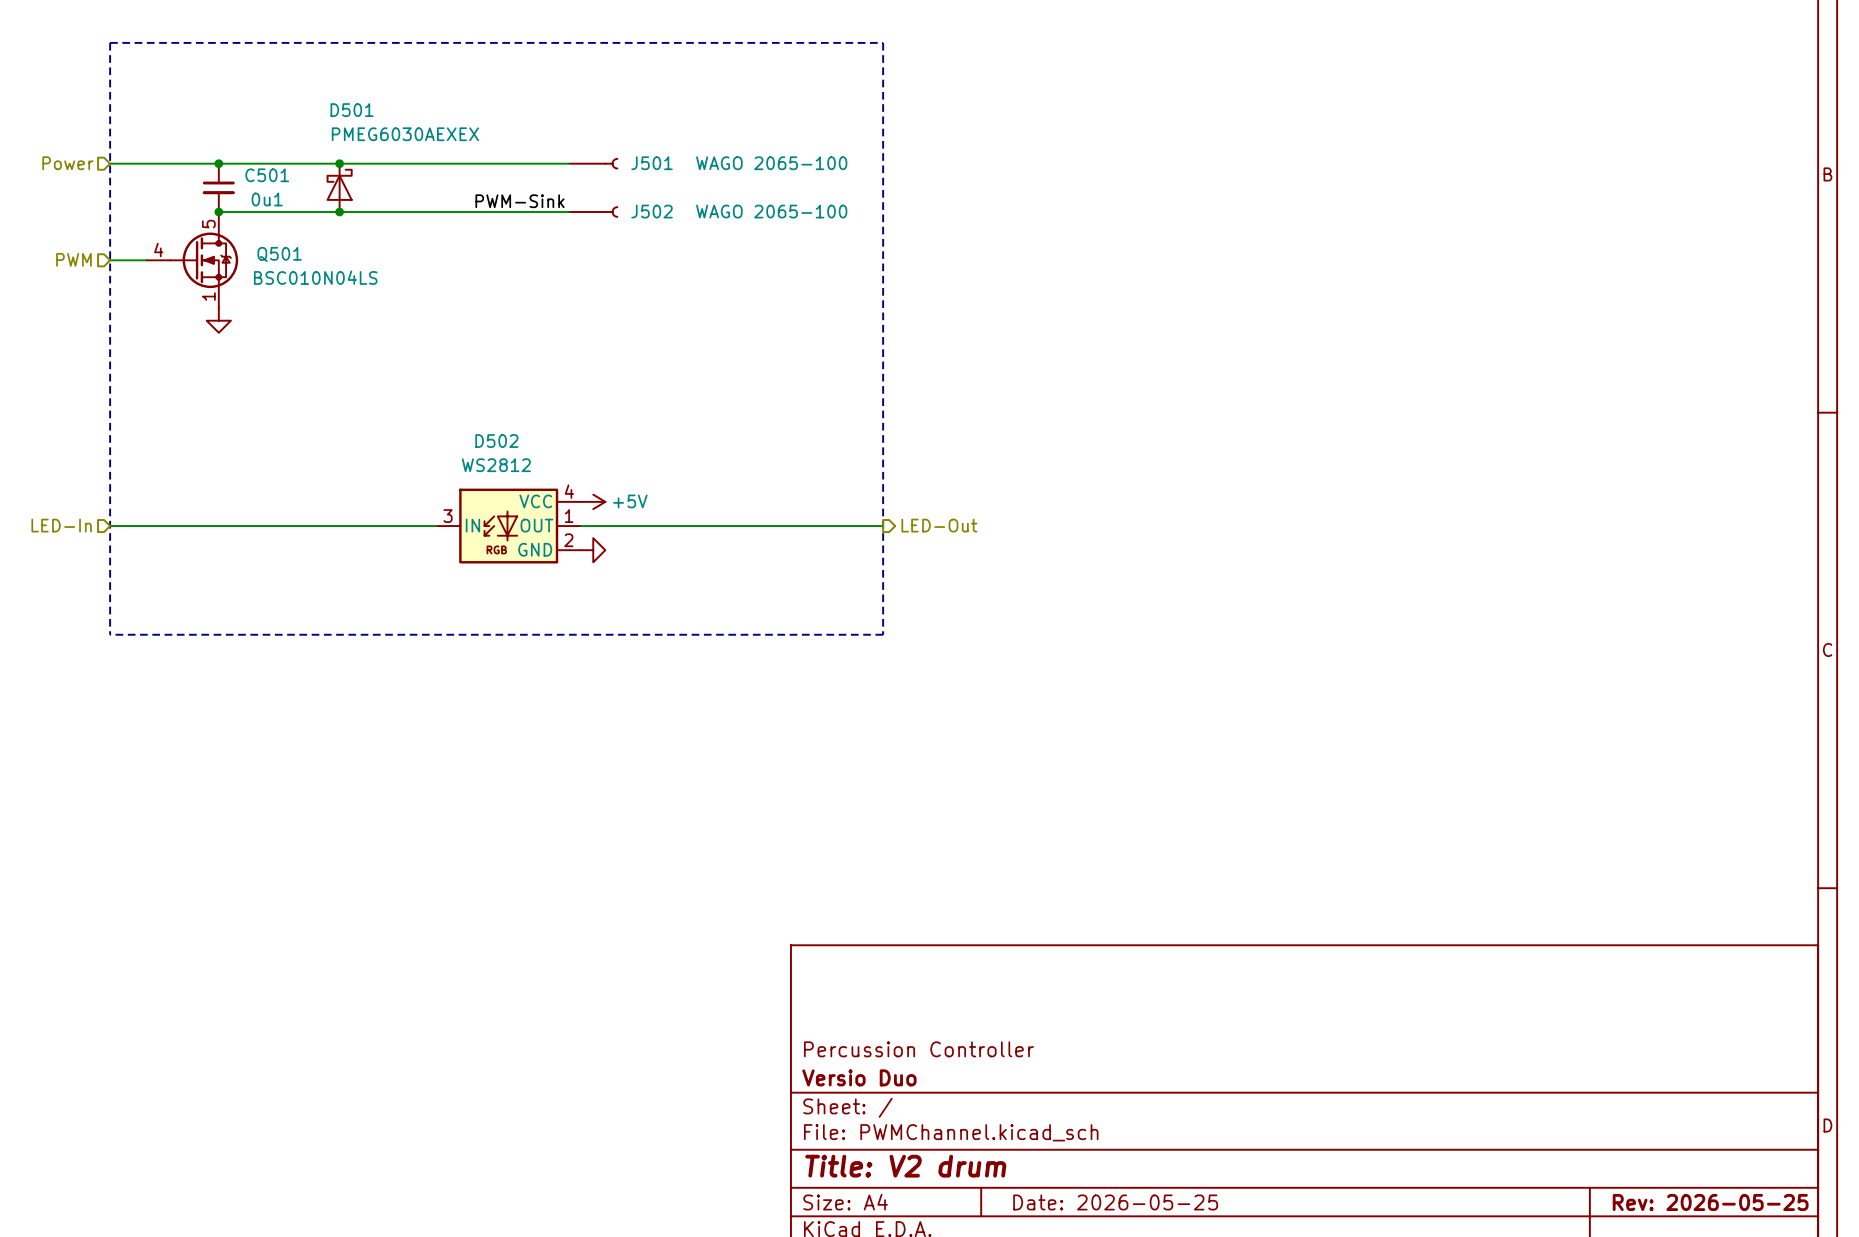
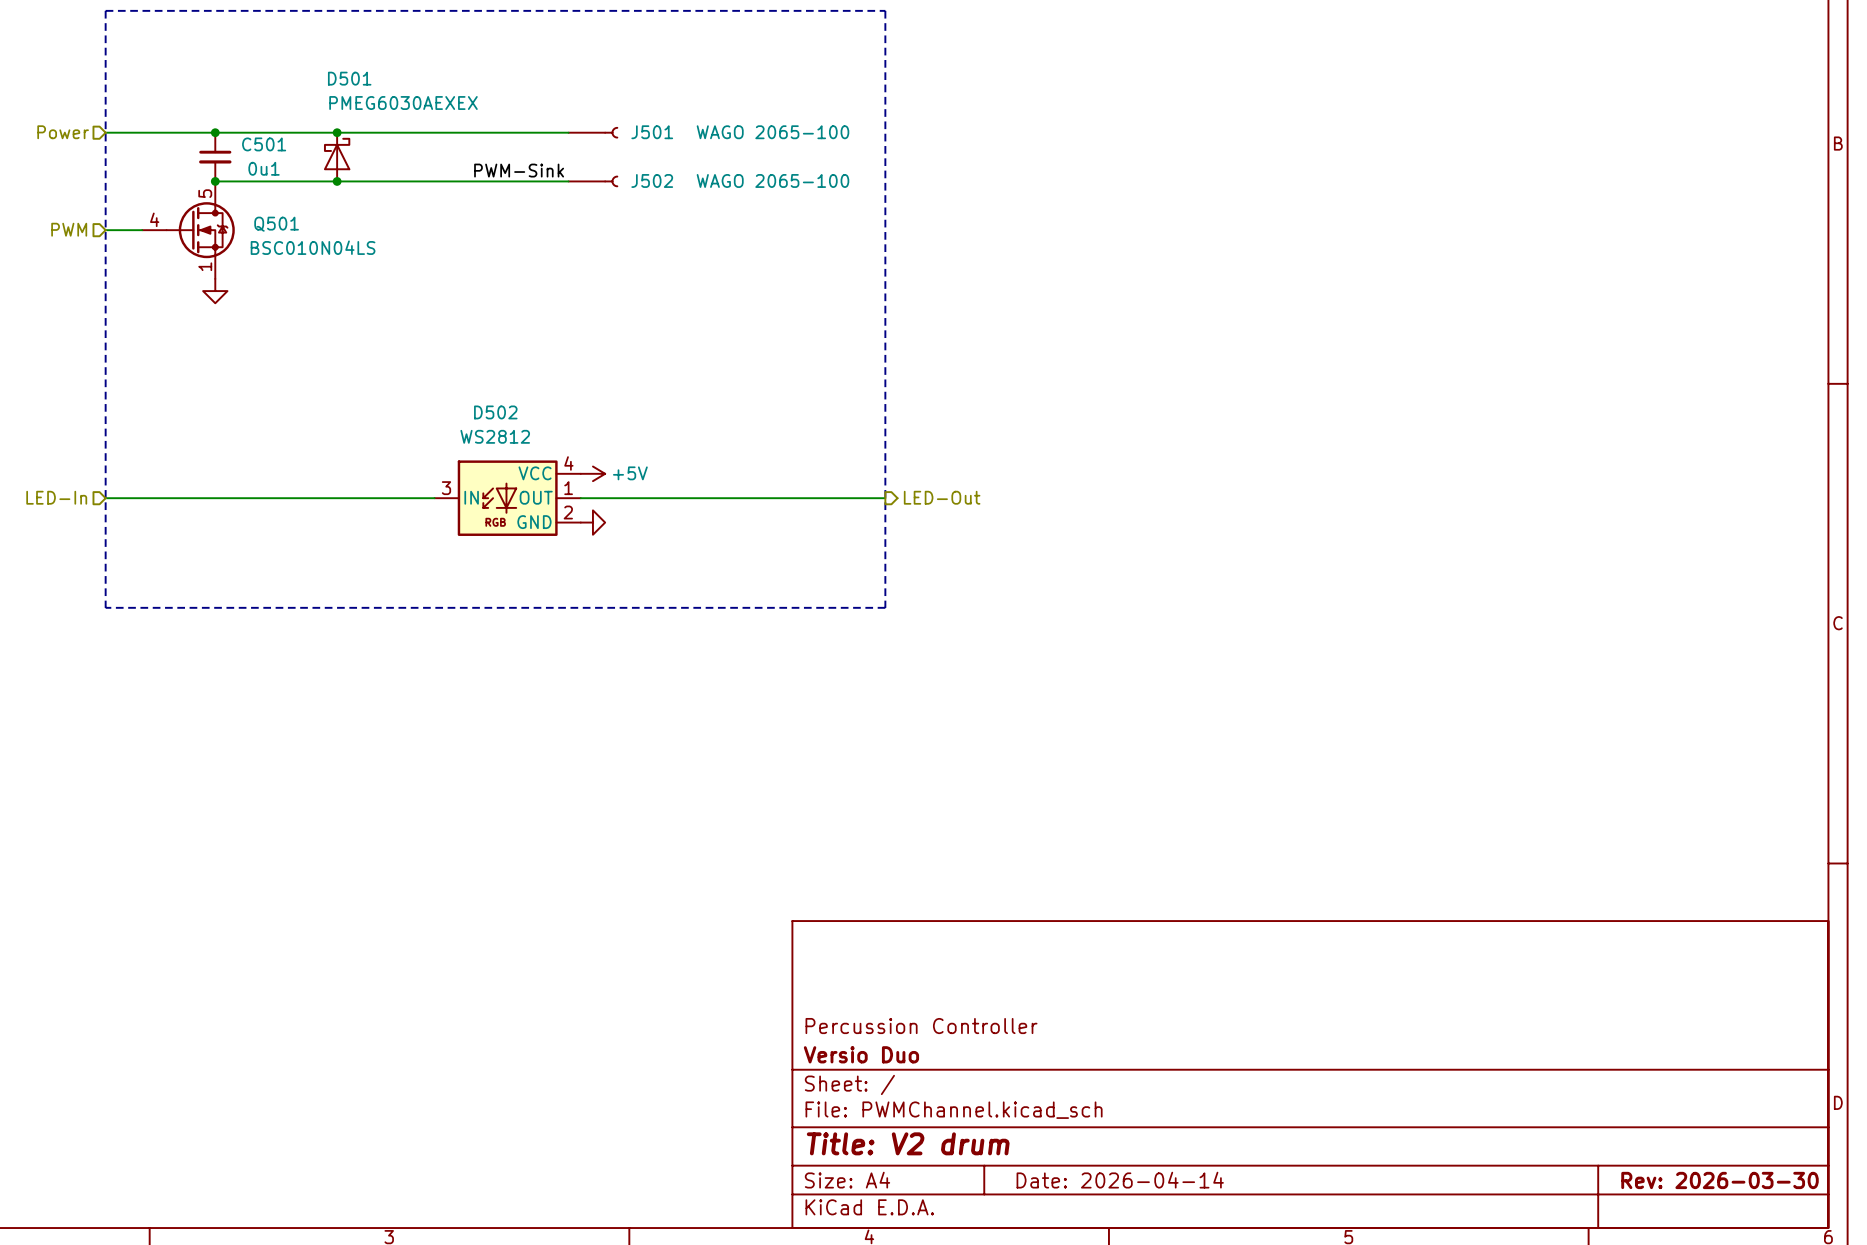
title block: Date: 2026-05-25 (1115, 1202) -> Date: 2026-04-14 (1120, 1180)
title block: Rev: 2026-05-25 (1710, 1202) -> Rev: 2026-03-30 (1720, 1180)

